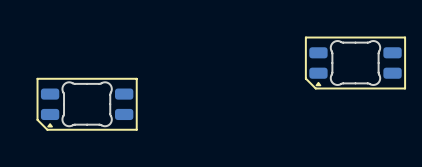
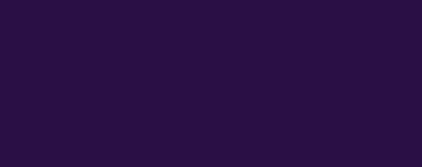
part: (355, 63) -> none
part: (87, 104) -> none

